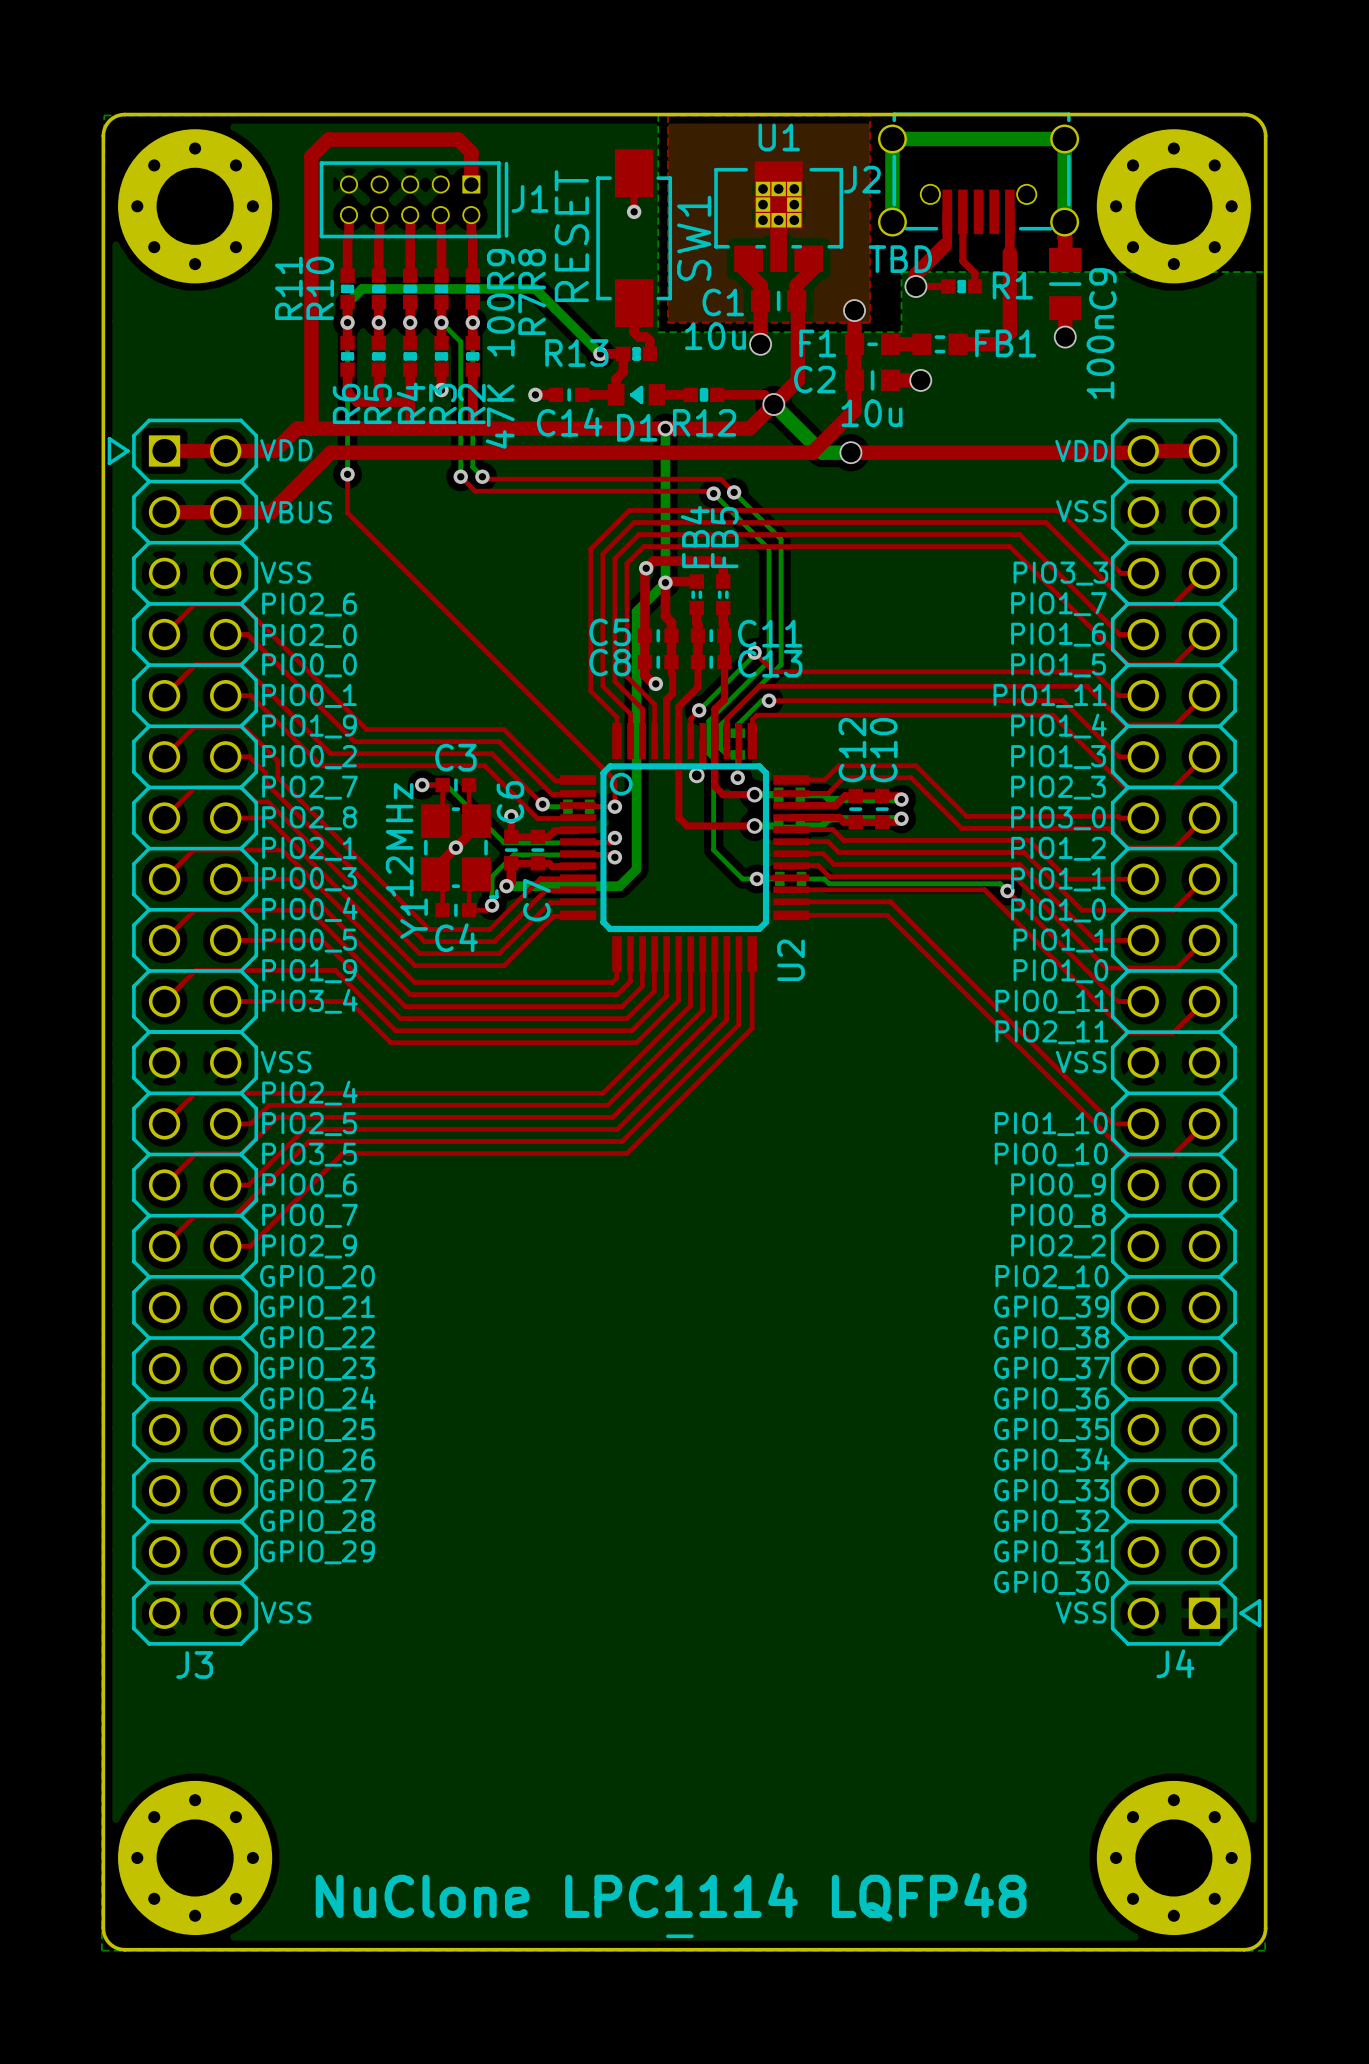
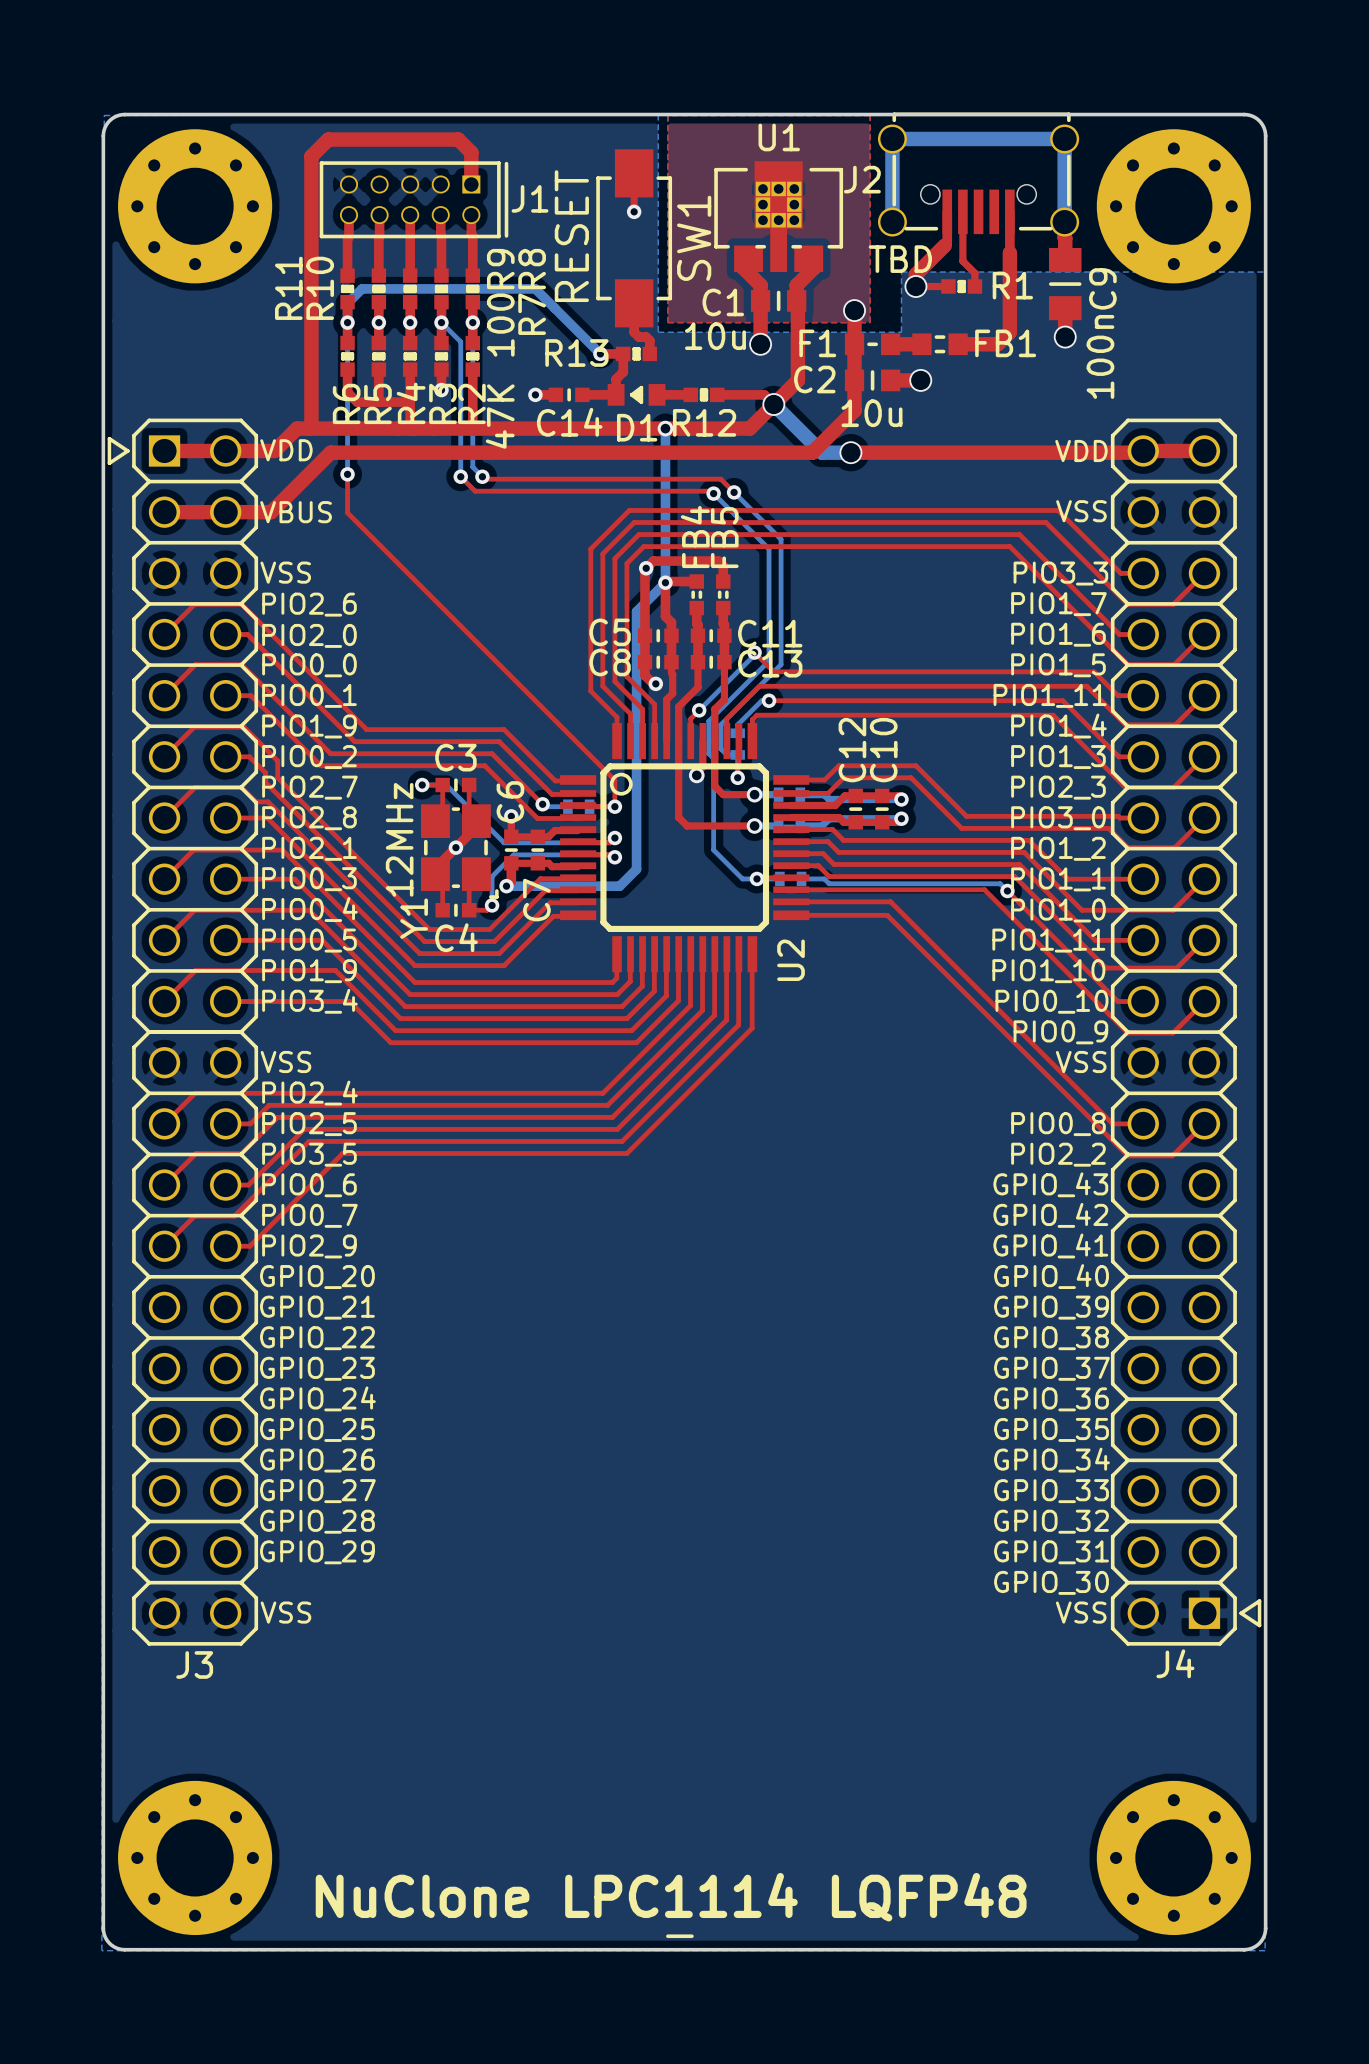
J4 footprint: [1110, 418, 1262, 1646] -> [1110, 418, 1262, 1646]

